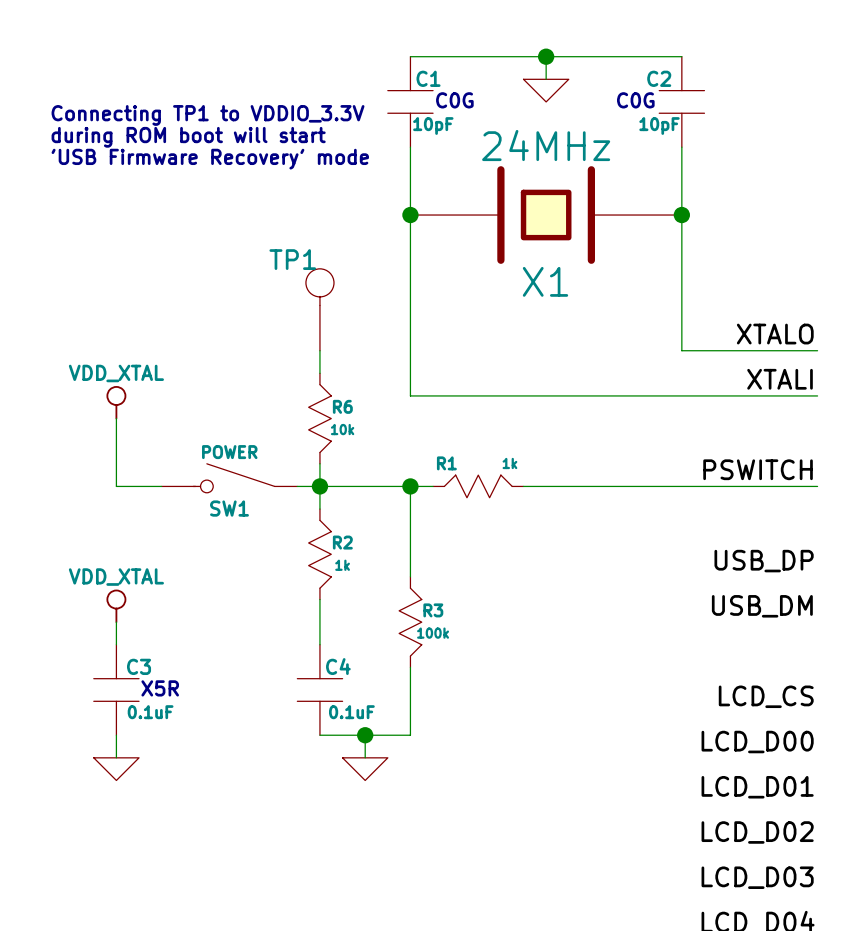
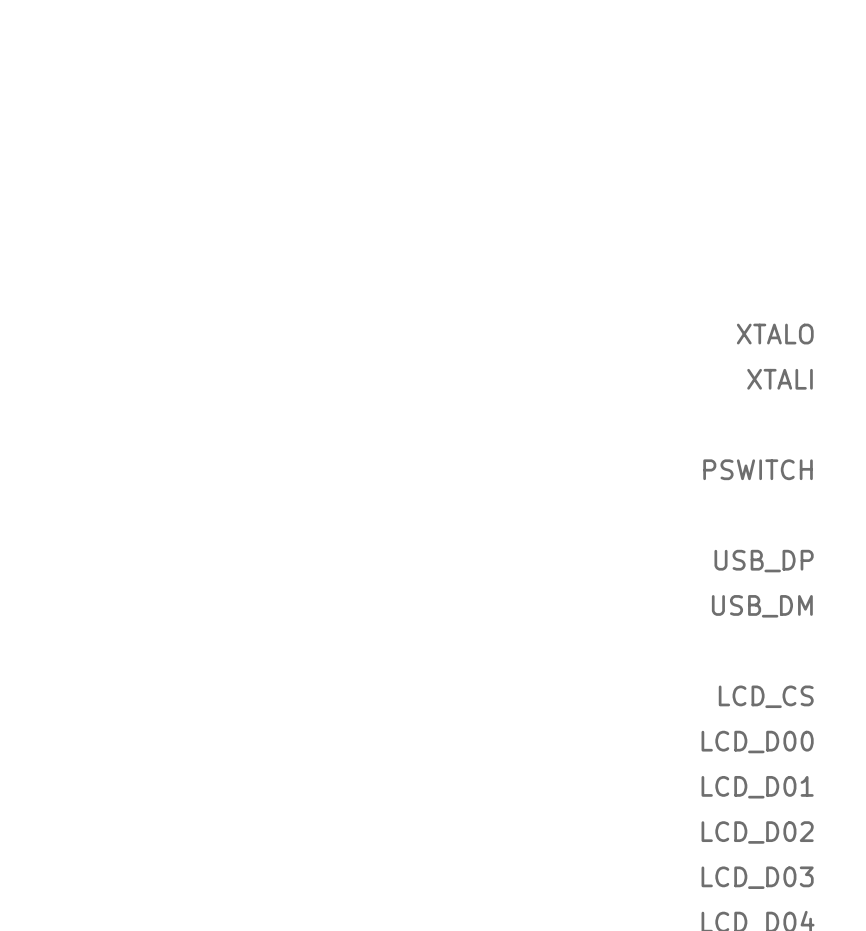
wire: (410, 56) (681, 56) -> none
wire: (546, 56) (546, 79) -> none
junction: (546, 56) -> none
power symbol: (546, 90) -> none
text: C0G (454, 100) -> none
text: C0G (635, 100) -> none
C1: 10pF (410, 101) -> none
C2: 10pF (681, 101) -> none
text: Connecting TP1 to VDDIO_3.3V (208, 115) -> none
text: during ROM boot will start (188, 137) -> none
wire: (410, 147) (410, 395) (817, 395) -> none
wire: (681, 147) (681, 350) (817, 350) -> none
text: 'USB Firmware Recovery' mode (210, 159) -> none
junction: (410, 215) -> none
X1: 24MHz (546, 215) -> none
junction: (681, 215) -> none
TP1: (319, 309) -> none
wire: (319, 350) (319, 373) -> none
power symbol: VDD_XTAL (116, 402) -> none
wire: (116, 418) (116, 486) (161, 486) -> none
R6: 10k (319, 418) -> none
wire: (319, 463) (319, 509) -> none
SW1: POWER (229, 478) -> none
wire: (297, 486) (433, 486) -> none
junction: (319, 486) -> none
wire: (410, 486) (410, 576) -> none
junction: (410, 486) -> none
R1: 1k (478, 486) -> none
wire: (523, 486) (817, 486) -> none
R2: 1k (319, 554) -> none
wire: (319, 599) (319, 644) -> none
power symbol: VDD_XTAL (116, 606) -> none
wire: (116, 622) (116, 644) -> none
R3: 100k (410, 622) -> none
wire: (410, 667) (410, 735) (319, 735) -> none
text: X5R (160, 688) -> none
C3: 0.1uF (116, 689) -> none
C4: 0.1uF (319, 689) -> none
wire: (116, 735) (116, 757) -> none
wire: (365, 735) (365, 757) -> none
junction: (365, 735) -> none
power symbol: (116, 769) -> none
power symbol: (365, 769) -> none

